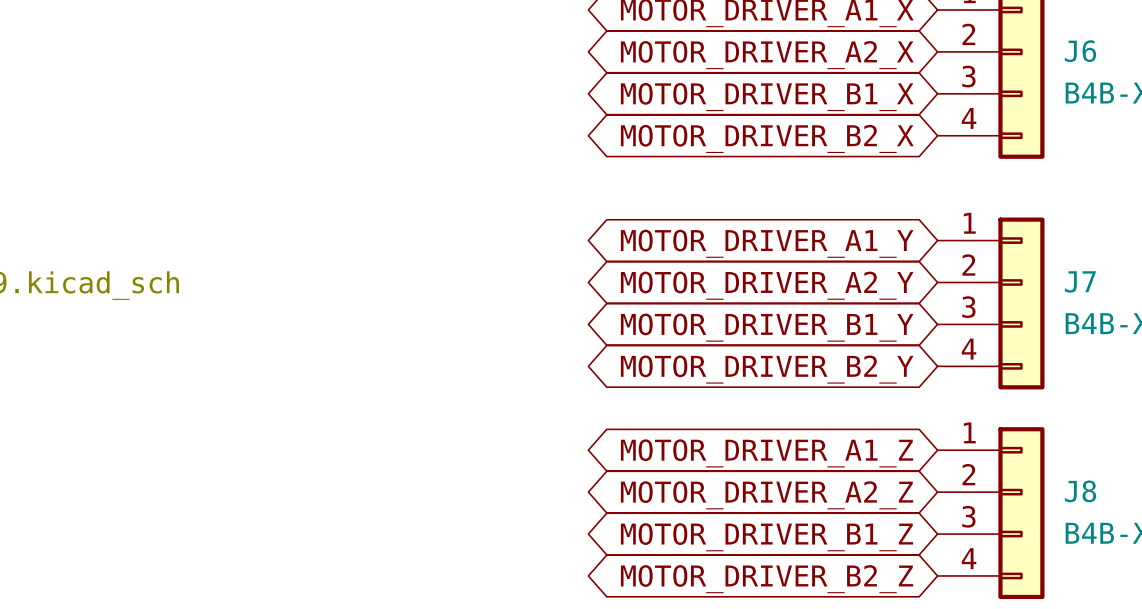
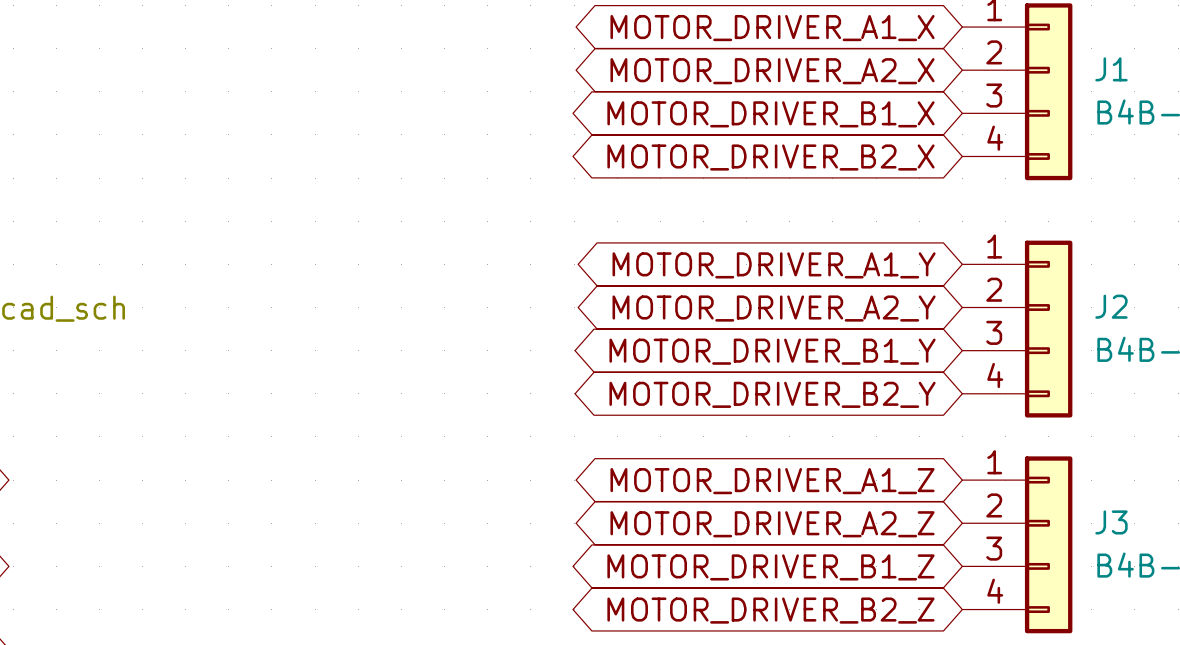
J6 name: J6 (1080, 51) -> J1 (1111, 69)
J7 name: J7 (1080, 281) -> J2 (1111, 306)
J8 name: J8 (1080, 491) -> J3 (1111, 522)

